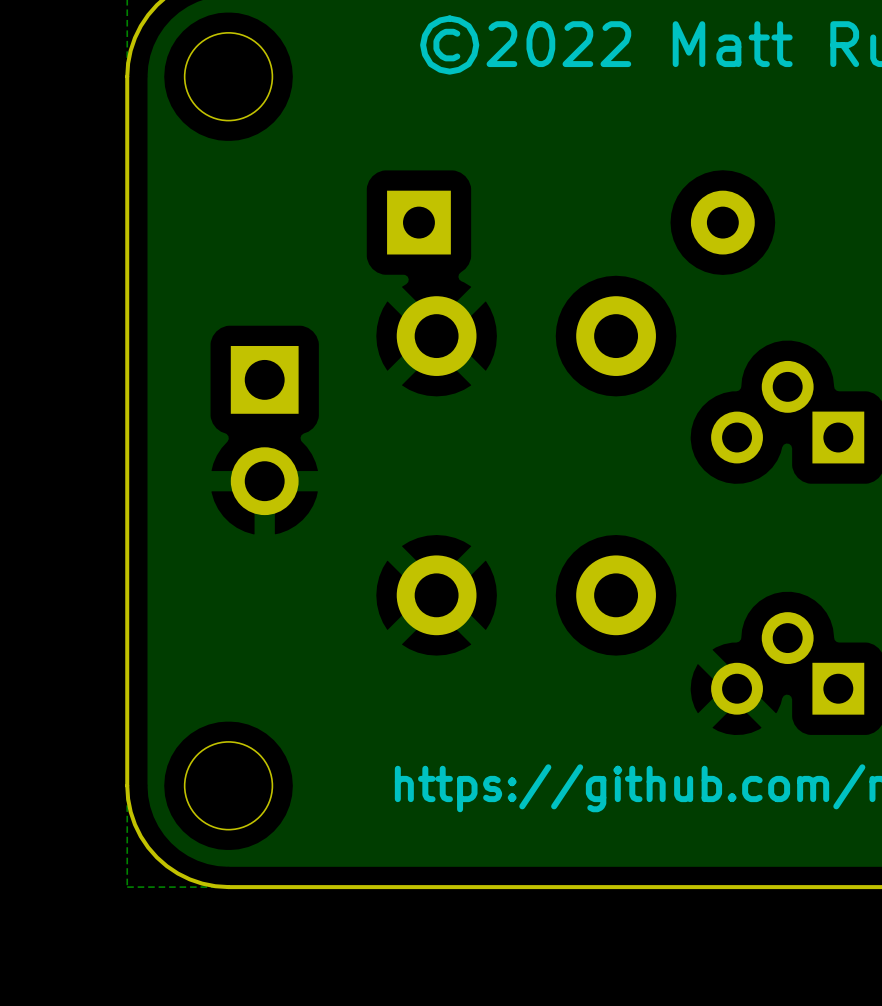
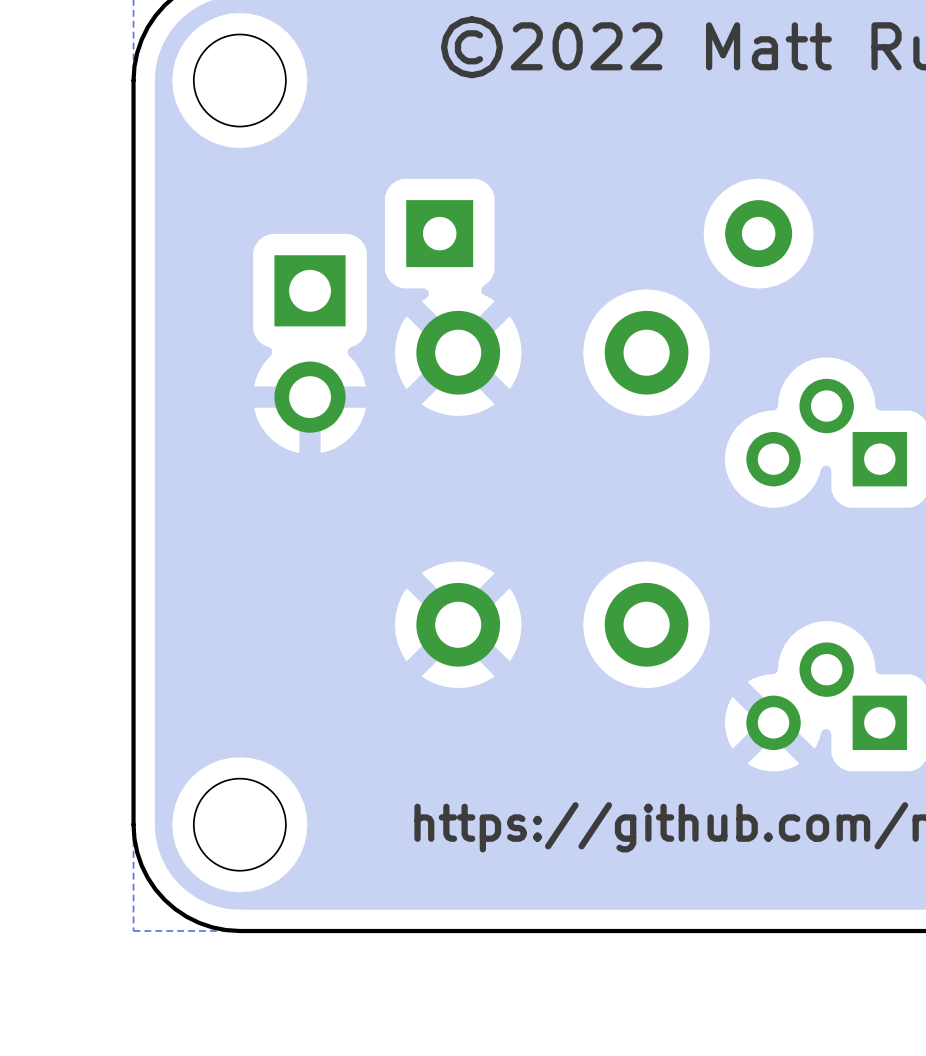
part position: (264, 430) -> (310, 343)

